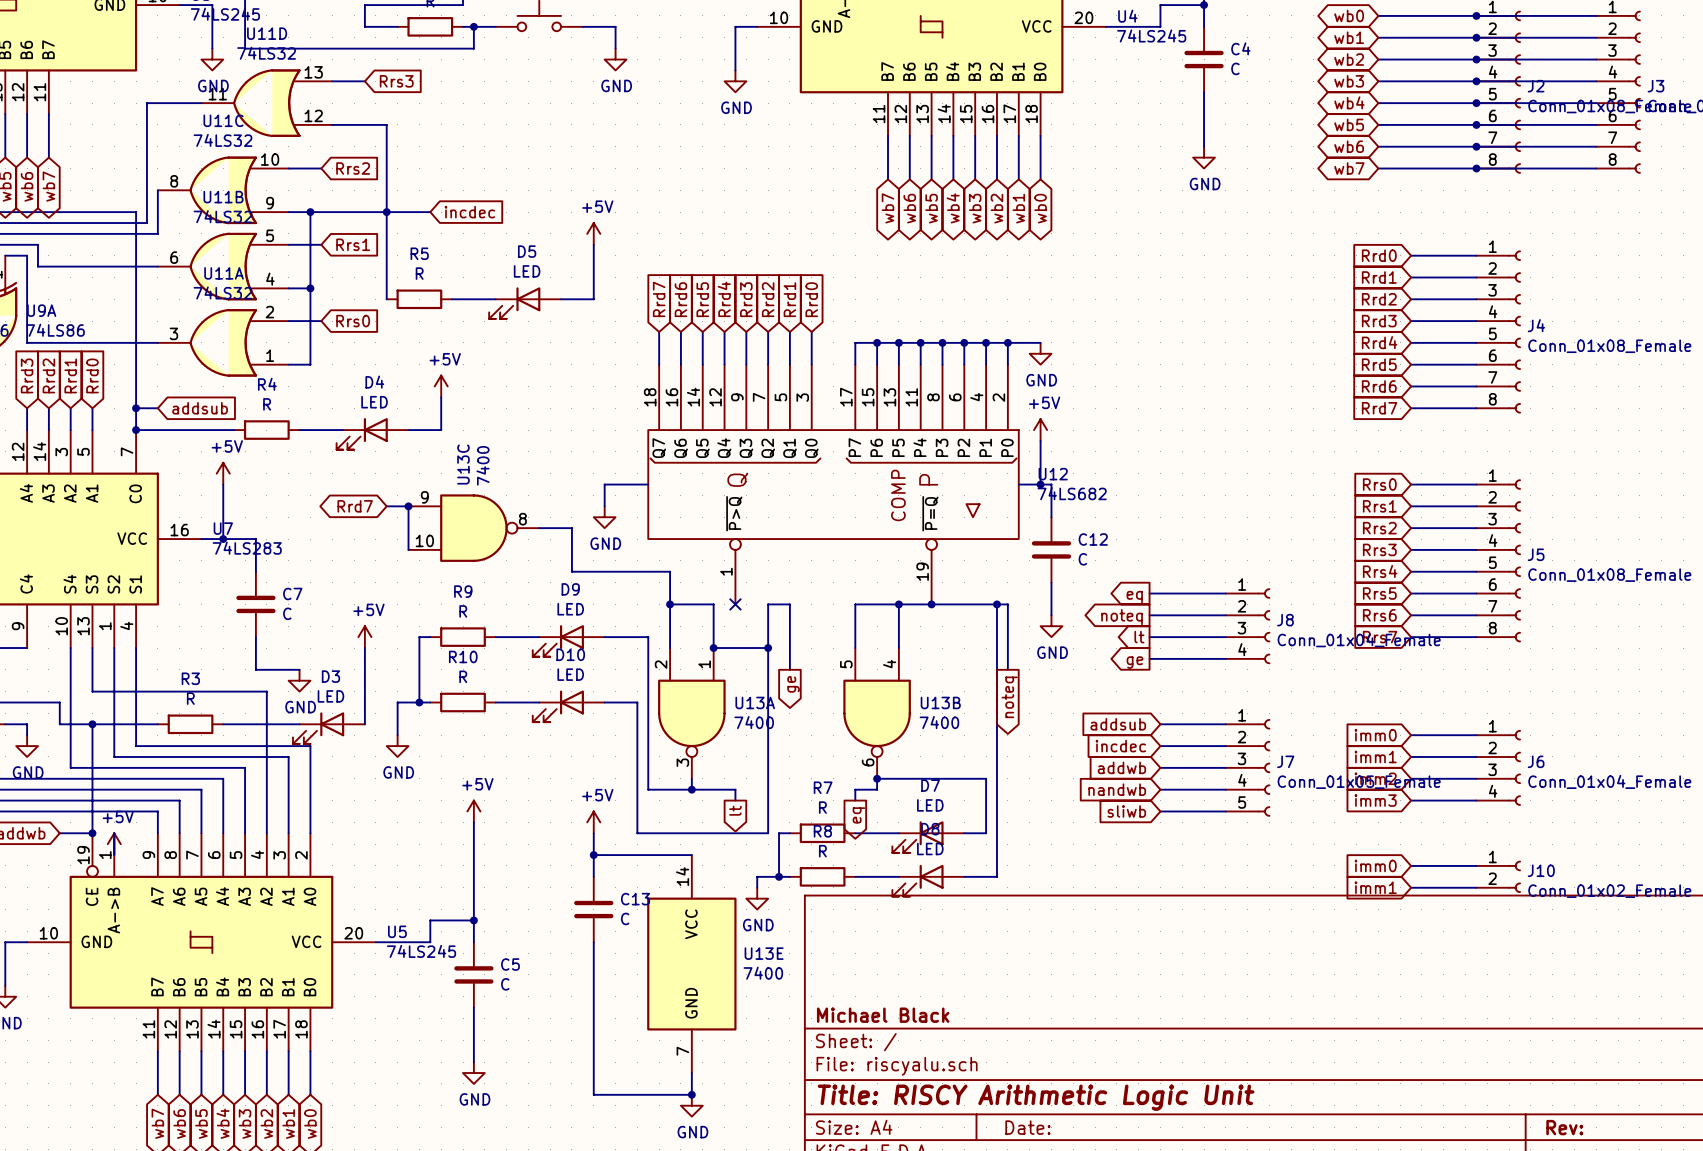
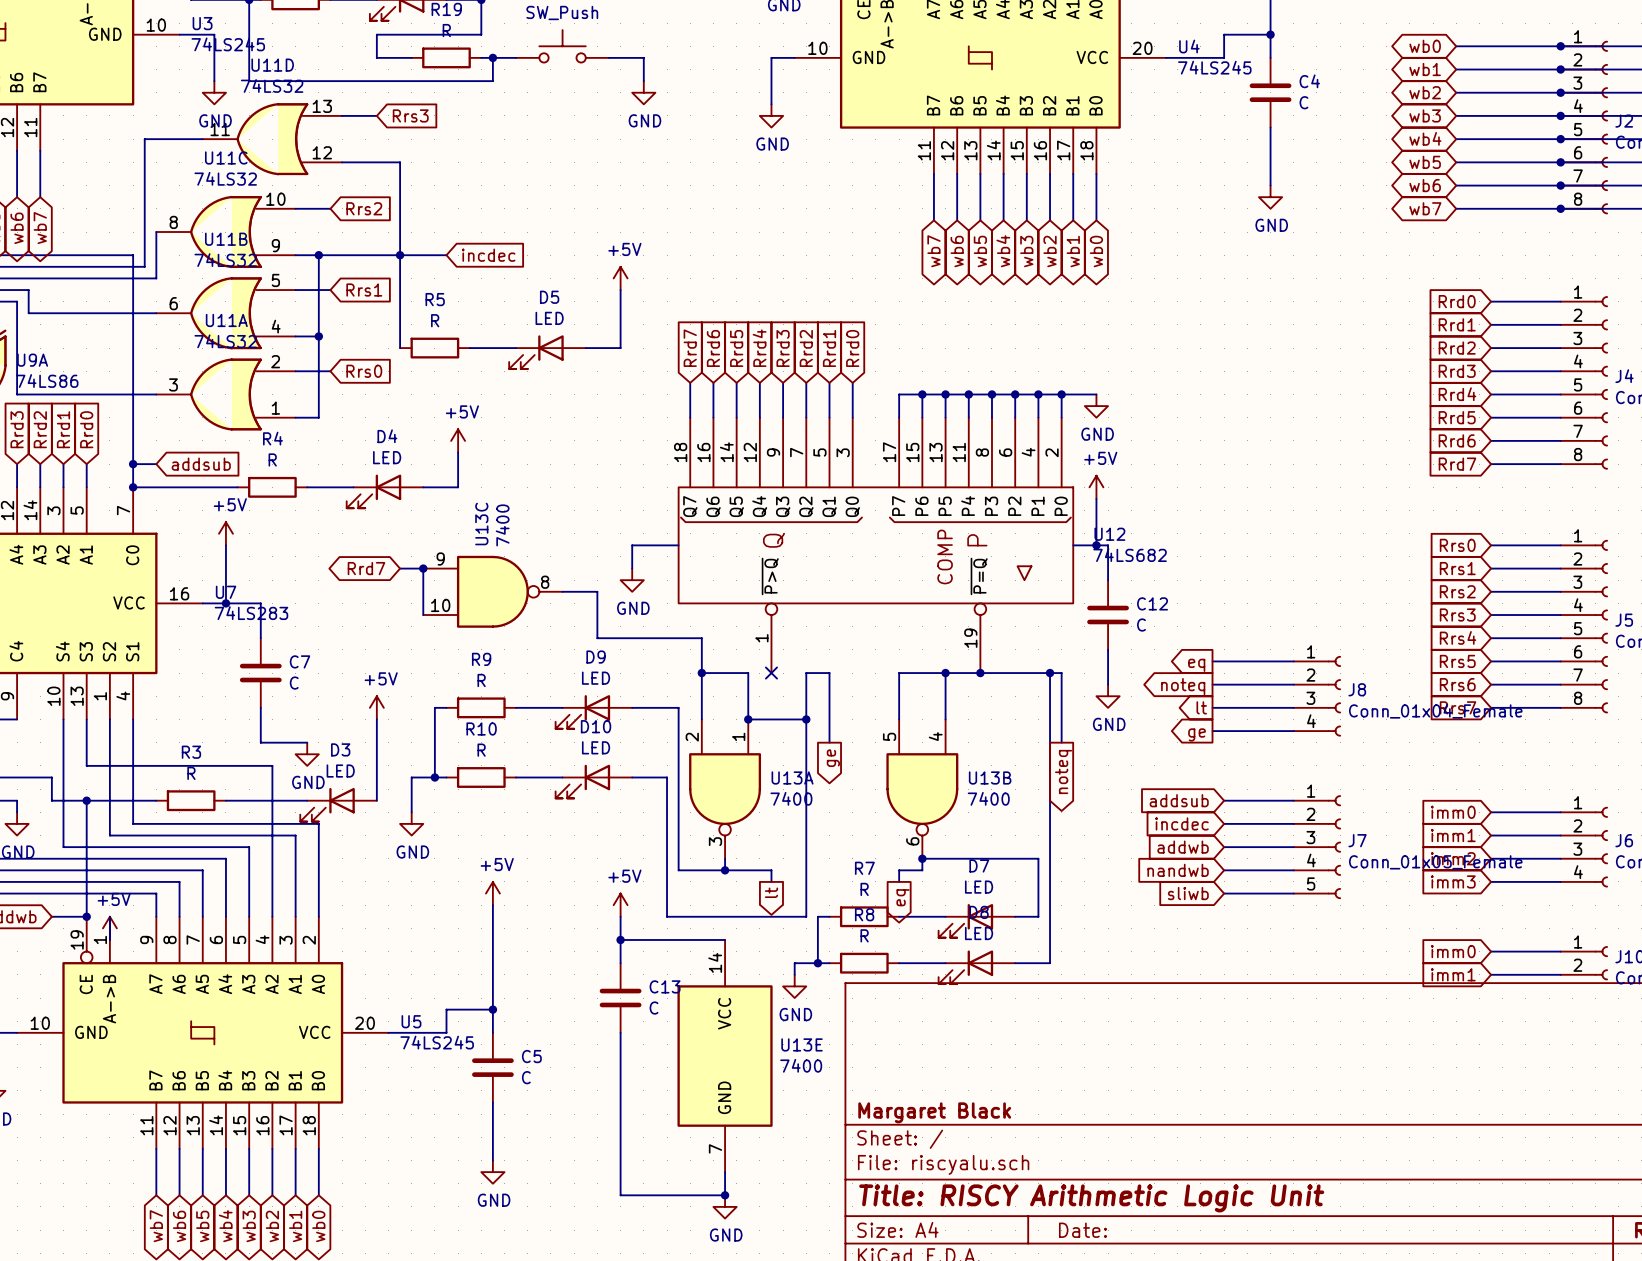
title block: Michael Black (883, 1015) -> Margaret Black (934, 1112)

